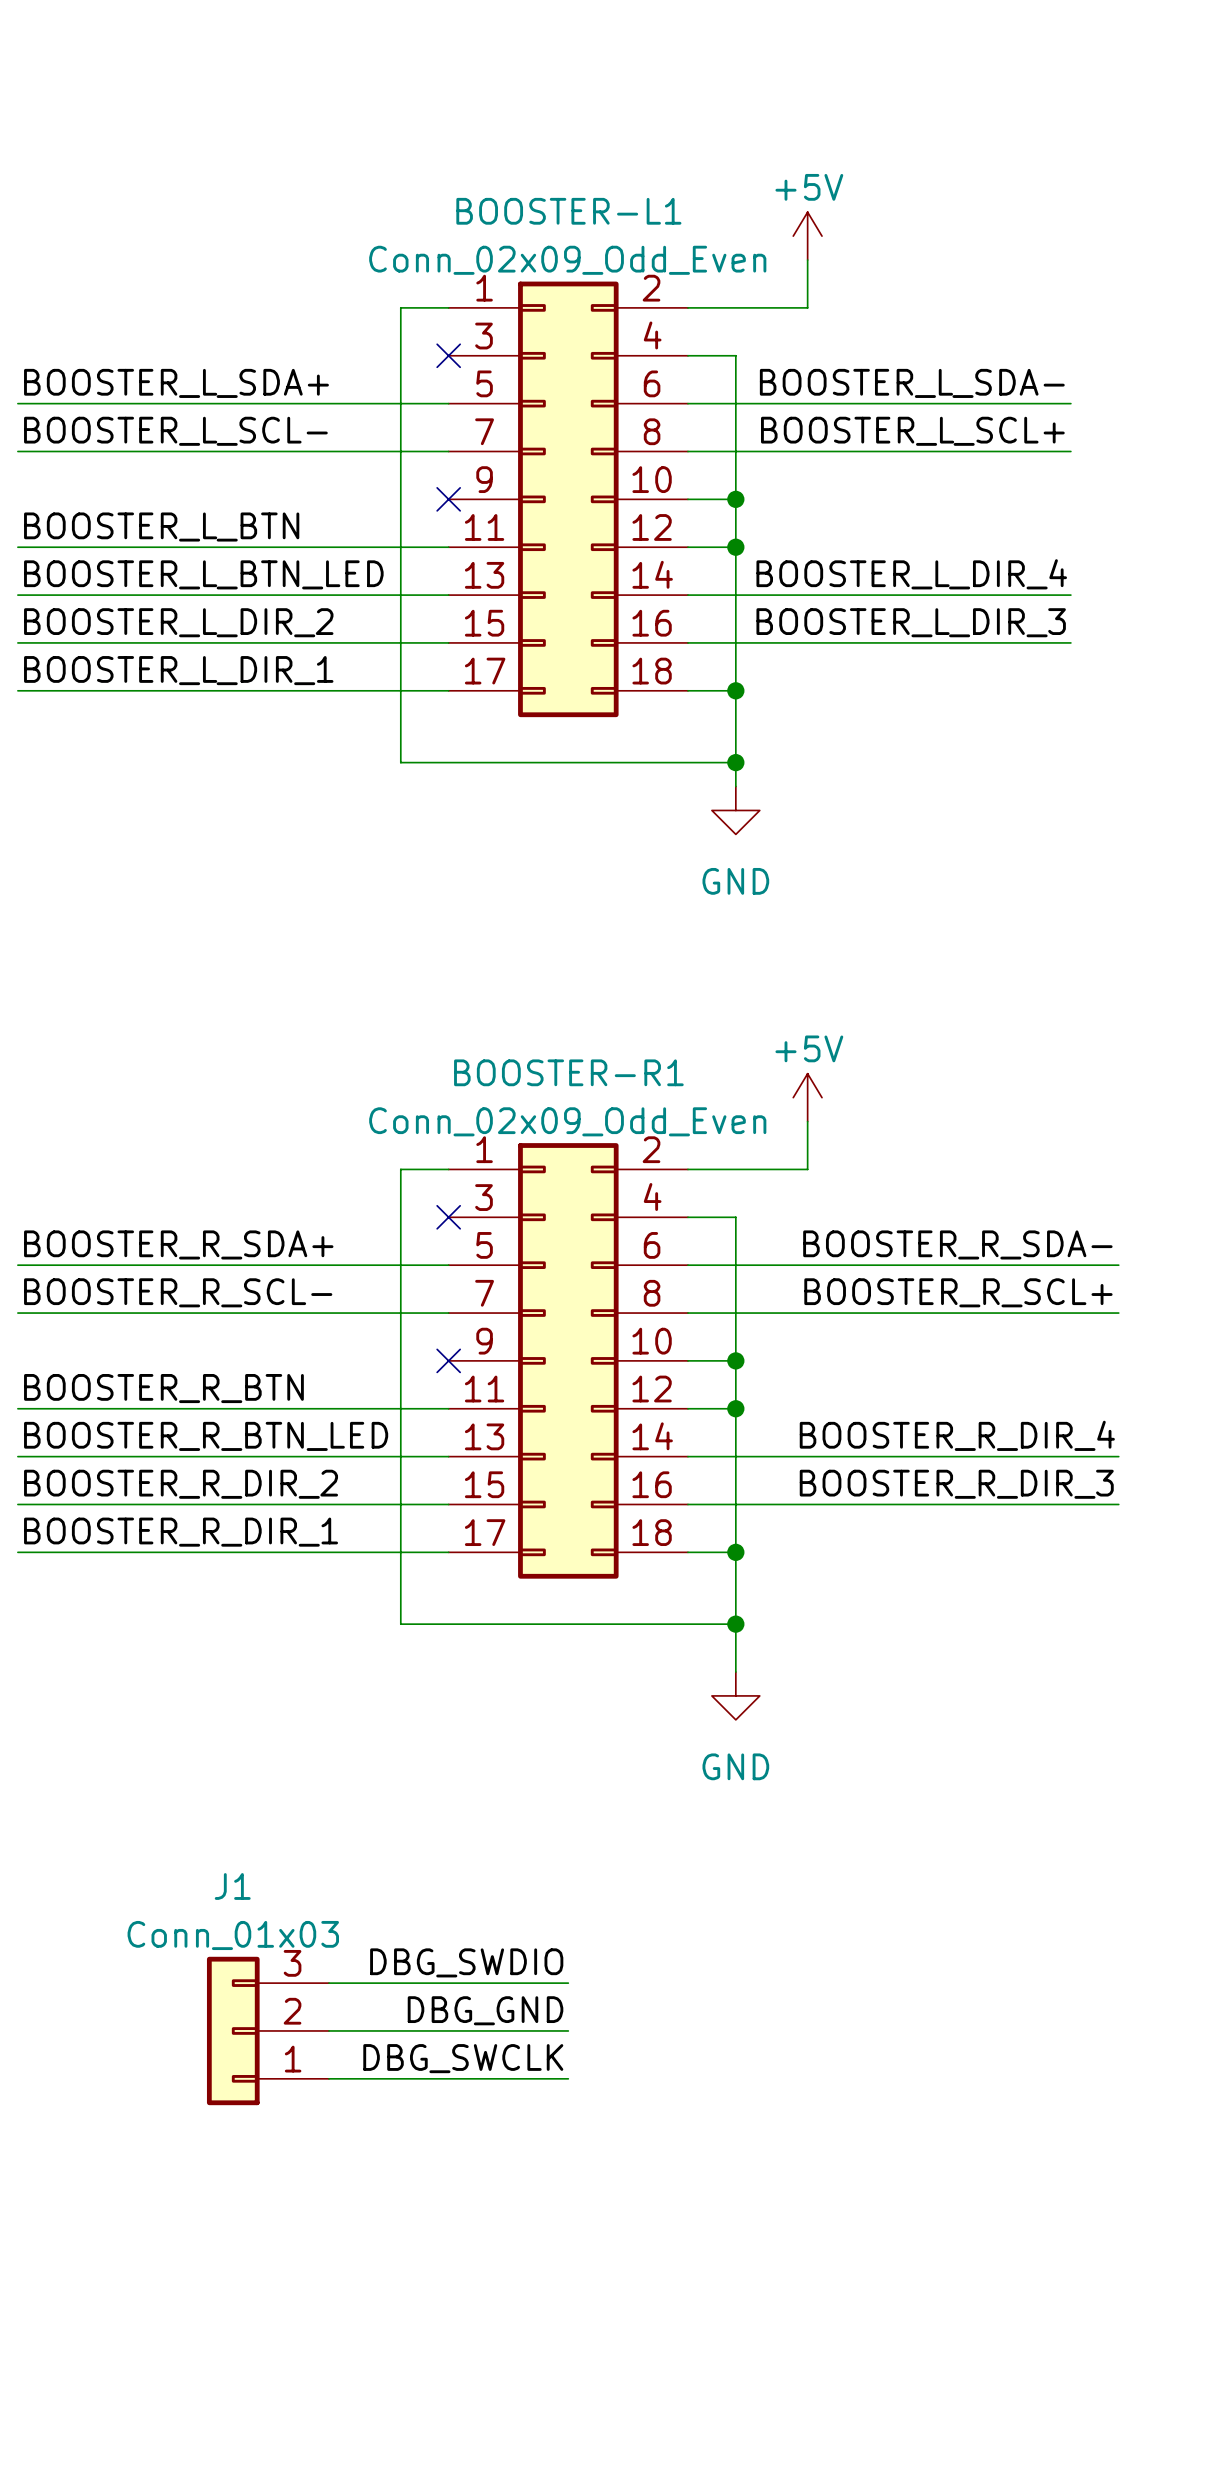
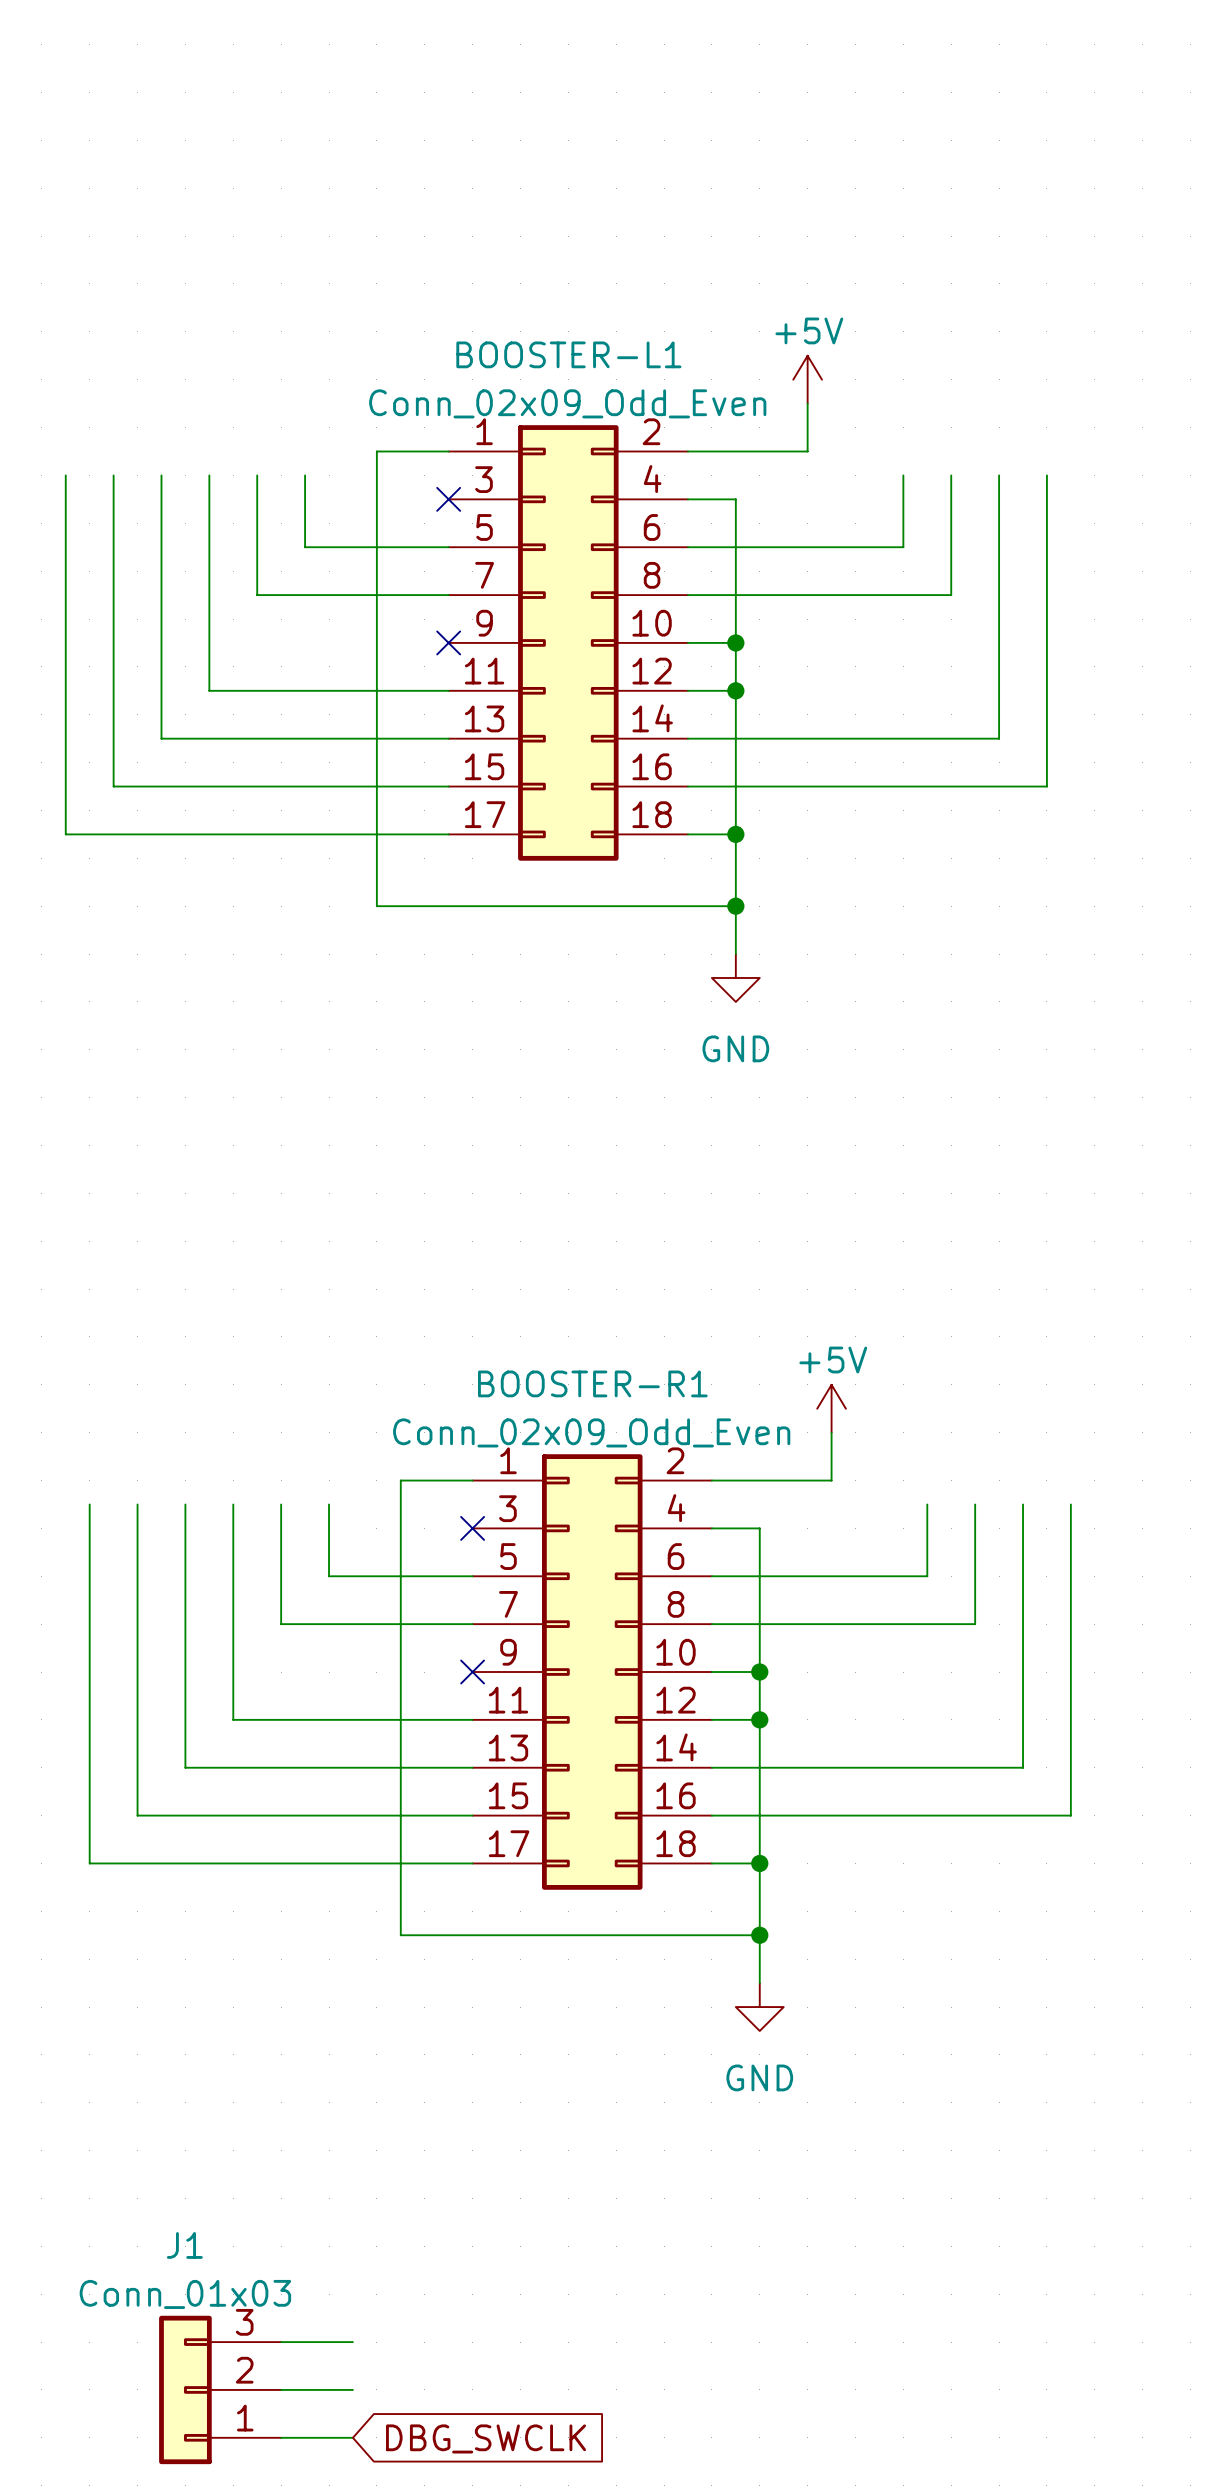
power symbol position: +5V (807, 236) -> +5V (807, 379)
wire: (807, 260) (807, 307) (687, 307) -> none
wire: (448, 307) (400, 307) (400, 762) (735, 762) -> none
no-connect mark: (448, 355) -> none
wire: (687, 355) (735, 355) (735, 499) -> none
label: BOOSTER_L_SDA+ (176, 383) -> none
label: BOOSTER_L_SDA- (912, 383) -> none
wire: (17, 403) (448, 403) -> none
wire: (687, 403) (1070, 403) -> none
label: BOOSTER_L_SCL- (175, 431) -> none
label: BOOSTER_L_SCL+ (912, 431) -> none
wire: (17, 451) (376, 451) -> (735, 906) (376, 906) (376, 451)
wire: (807, 451) (1070, 451) -> (807, 451) (807, 403)
wire: none -> (65, 475) (65, 834) (448, 834)
wire: none -> (113, 475) (113, 786) (448, 786)
wire: none -> (161, 475) (161, 738) (448, 738)
wire: none -> (903, 475) (903, 547) (735, 547)
wire: none -> (999, 475) (999, 738) (687, 738)
wire: none -> (1046, 475) (1046, 786) (687, 786)
BOOSTER-L1 position: (568, 499) -> (568, 642)
junction: (735, 499) -> none
label: BOOSTER_L_BTN (161, 527) -> none
wire: (17, 547) (305, 547) -> (305, 475) (305, 547)
junction: (735, 547) -> none
label: BOOSTER_L_BTN_LED (203, 574) -> none
label: BOOSTER_L_DIR_4 (911, 574) -> none
wire: (17, 595) (257, 595) -> (257, 475) (257, 595)
wire: (951, 595) (1070, 595) -> (951, 595) (951, 475)
label: BOOSTER_L_DIR_2 (178, 622) -> none
label: BOOSTER_L_DIR_3 (911, 622) -> none
wire: (17, 642) (448, 642) -> none
no-connect mark: none -> (448, 642)
wire: (735, 642) (1070, 642) -> none
junction: none -> (735, 642)
label: BOOSTER_L_DIR_1 (178, 670) -> none
wire: (17, 690) (209, 690) -> (209, 475) (209, 690)
junction: (735, 762) -> none
wire: none -> (735, 786) (735, 954)
power symbol position: GND (735, 810) -> GND (735, 977)
wire: none -> (687, 834) (735, 834)
junction: none -> (735, 834)
junction: none -> (735, 906)
power symbol position: +5V (807, 1097) -> +5V (831, 1408)
wire: (807, 1121) (807, 1169) (687, 1169) -> (831, 1432) (831, 1480) (711, 1480)
wire: (448, 1169) (400, 1169) (400, 1480) -> (472, 1480) (400, 1480)
no-connect mark: (448, 1217) -> none
wire: (687, 1217) (735, 1217) (735, 1672) -> (711, 1528) (759, 1528) (759, 1983)
label: BOOSTER_R_SDA+ (178, 1244) -> none
label: BOOSTER_R_SDA- (957, 1244) -> none
wire: (17, 1265) (448, 1265) -> none
wire: (687, 1265) (1118, 1265) -> none
label: BOOSTER_R_SCL- (178, 1292) -> none
label: BOOSTER_R_SCL+ (958, 1292) -> none
wire: (17, 1313) (448, 1313) -> none
wire: (687, 1313) (1118, 1313) -> none
no-connect mark: (448, 1360) -> none
BOOSTER-R1 position: (568, 1360) -> (592, 1672)
wire: (687, 1360) (735, 1360) -> (711, 1672) (759, 1672)
junction: (735, 1360) -> none
label: BOOSTER_R_BTN (163, 1388) -> none
wire: (17, 1408) (448, 1408) -> none
wire: (687, 1408) (735, 1408) -> (711, 1719) (759, 1719)
junction: (735, 1408) -> none
label: BOOSTER_R_DIR_4 (957, 1435) -> none
label: BOOSTER_R_BTN_LED (206, 1436) -> none
wire: (17, 1456) (448, 1456) -> none
wire: (687, 1456) (1118, 1456) -> none
label: BOOSTER_R_DIR_2 (181, 1484) -> none
label: BOOSTER_R_DIR_3 (956, 1484) -> none
wire: (17, 1504) (448, 1504) -> none
wire: none -> (89, 1504) (89, 1863) (472, 1863)
wire: none -> (137, 1504) (137, 1815) (472, 1815)
wire: none -> (185, 1504) (185, 1767) (472, 1767)
wire: none -> (233, 1504) (233, 1719) (472, 1719)
wire: none -> (281, 1504) (281, 1624) (400, 1624) (400, 1935) (759, 1935)
wire: none -> (329, 1504) (329, 1576) (472, 1576)
wire: (687, 1504) (1118, 1504) -> none
wire: none -> (927, 1504) (927, 1576) (711, 1576)
wire: none -> (975, 1504) (975, 1624) (735, 1624)
wire: none -> (1023, 1504) (1023, 1767) (711, 1767)
wire: none -> (1070, 1504) (1070, 1815) (711, 1815)
no-connect mark: none -> (472, 1528)
label: BOOSTER_R_DIR_1 (181, 1532) -> none
wire: (17, 1552) (448, 1552) -> none
wire: (687, 1552) (735, 1552) -> (711, 1863) (759, 1863)
junction: (735, 1552) -> none
junction: (735, 1624) -> none
no-connect mark: none -> (472, 1672)
junction: none -> (759, 1672)
power symbol position: GND (735, 1695) -> GND (759, 2007)
junction: none -> (759, 1719)
junction: none -> (759, 1863)
junction: none -> (759, 1935)
label: DBG_SWDIO (466, 1962) -> none
wire: (329, 1983) (568, 1983) -> none
label: DBG_GND (485, 2010) -> none
J1 position: (267, 2030) -> (220, 2389)
wire: (329, 2030) (568, 2030) -> none
label: DBG_SWCLK (463, 2058) -> none
wire: (329, 2078) (568, 2078) -> none
wire: none -> (281, 2342) (352, 2342)
wire: none -> (281, 2389) (352, 2389)
wire: none -> (281, 2437) (352, 2437)
global label: none -> DBG_SWCLK (486, 2438)

